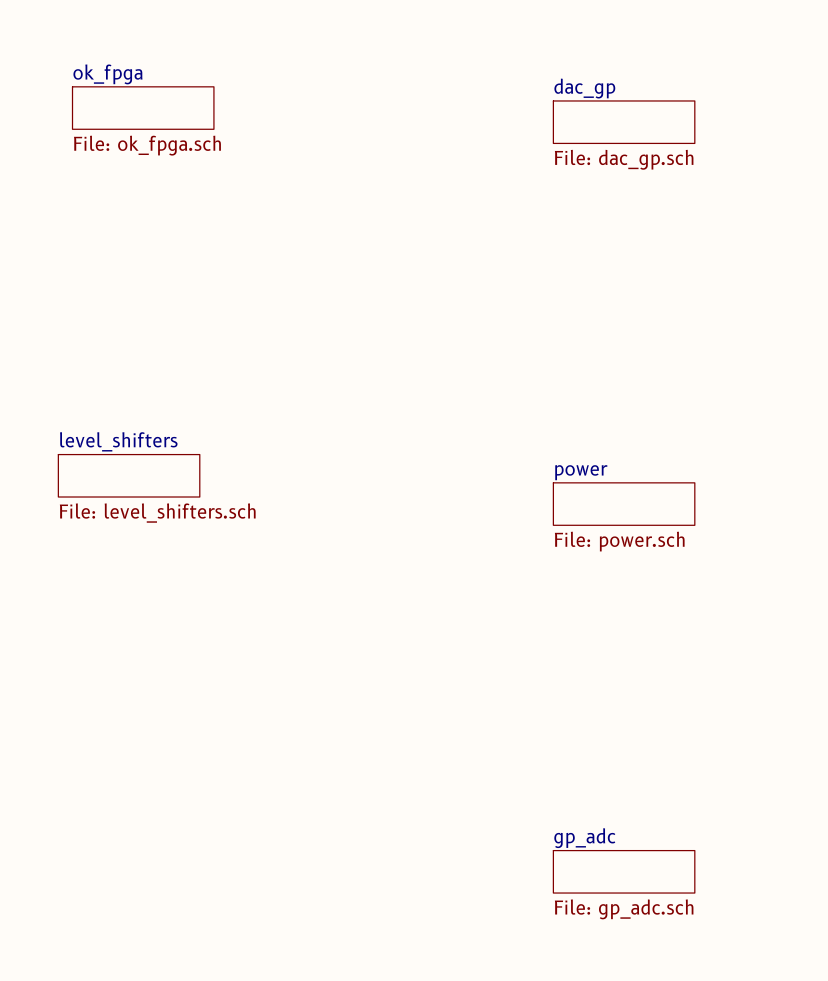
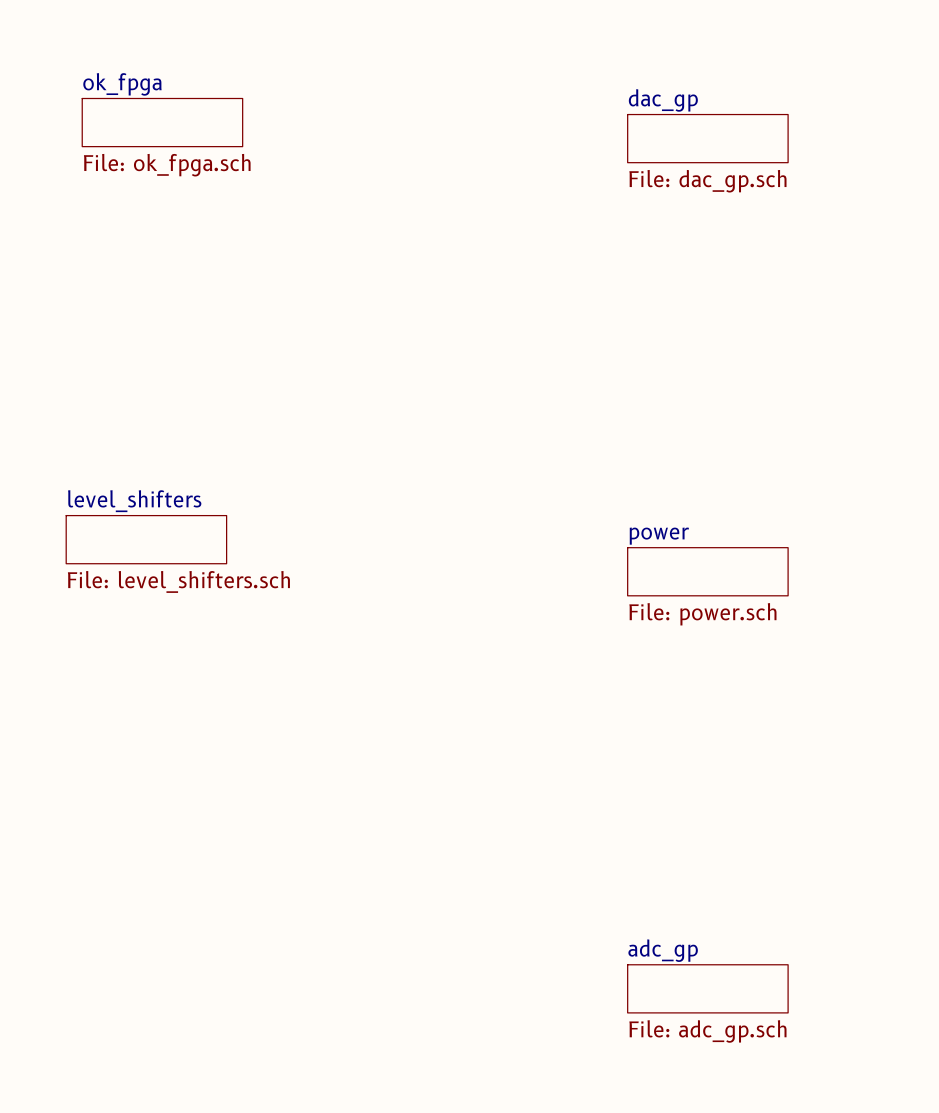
sheet gp_adc name: gp_adc (584, 838) -> adc_gp (663, 950)
sheet gp_adc value: File: gp_adc.sch (624, 909) -> File: adc_gp.sch (707, 1031)

